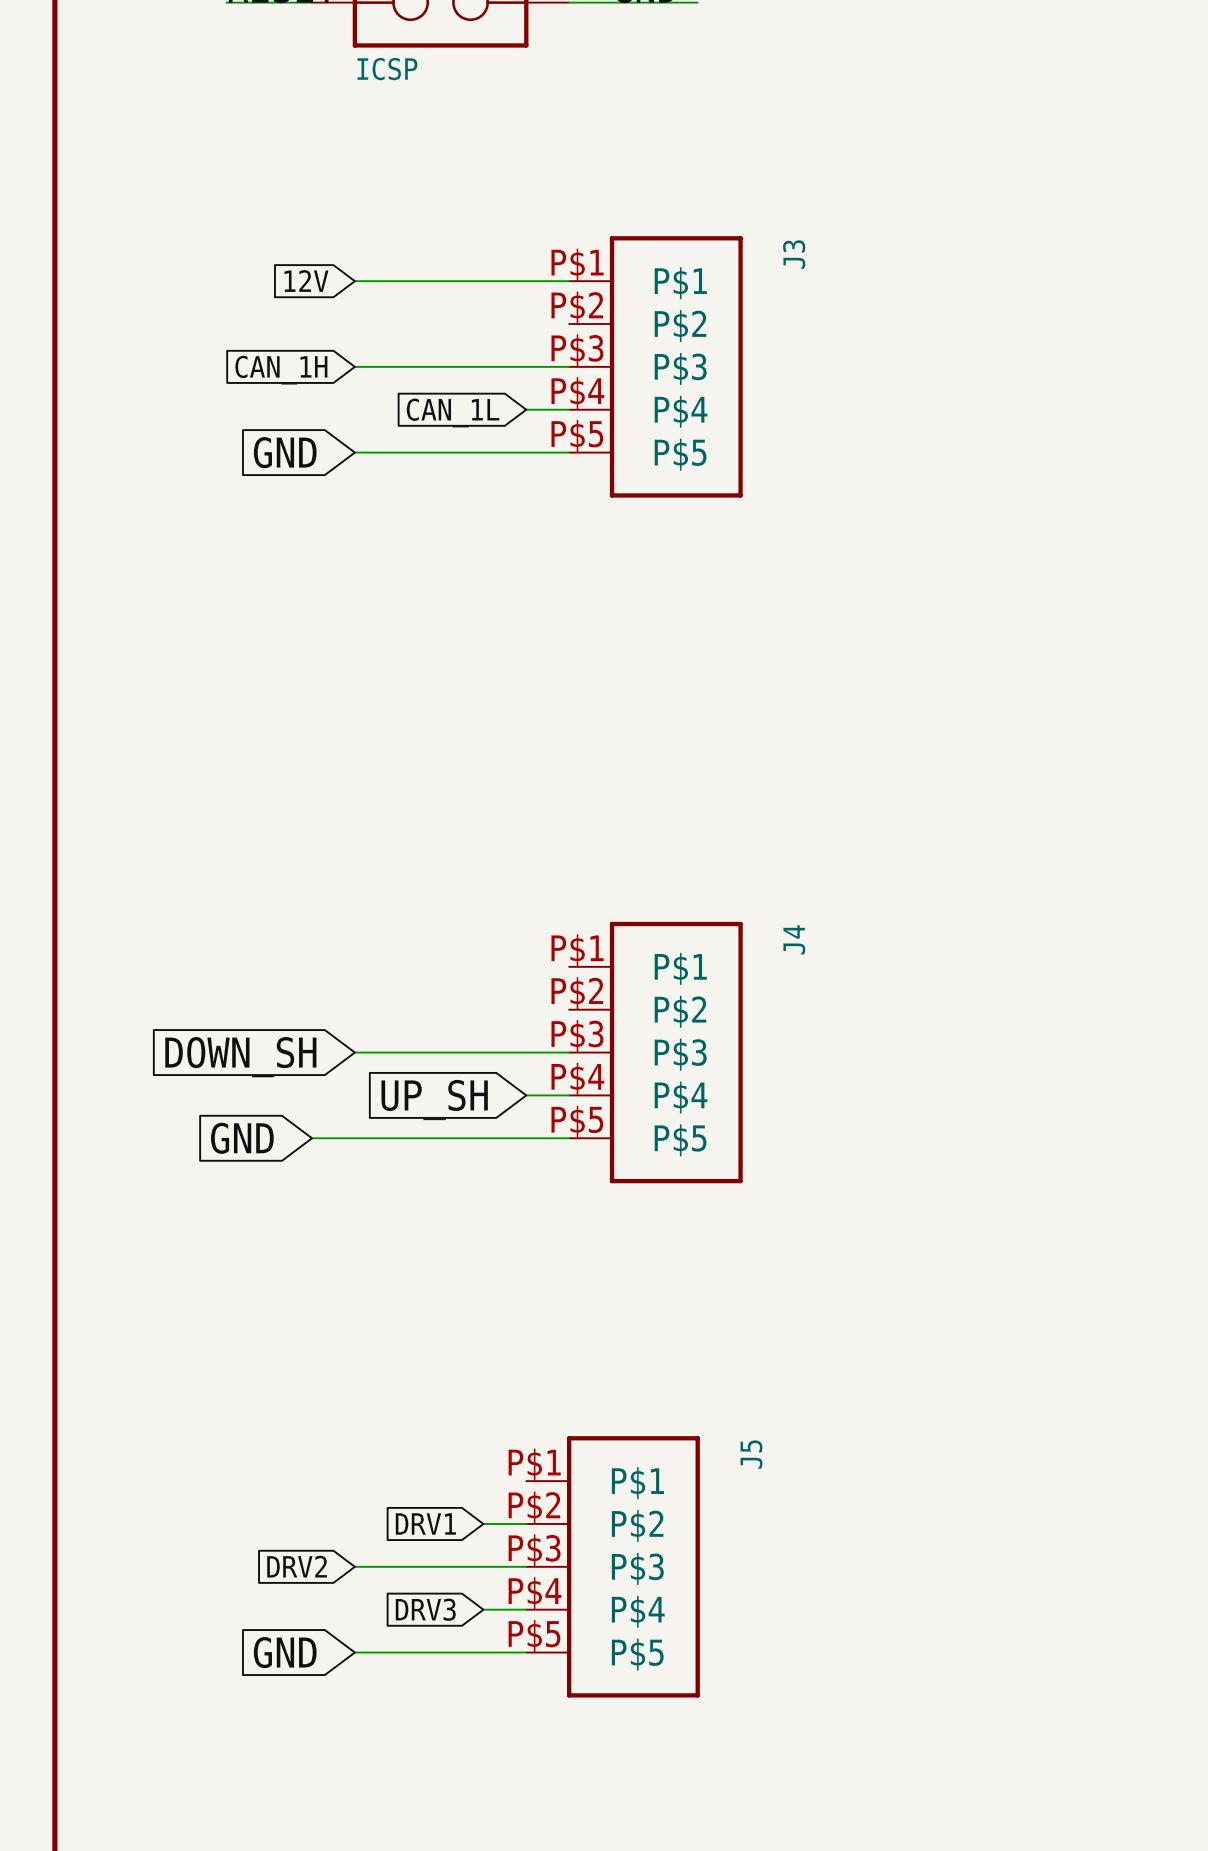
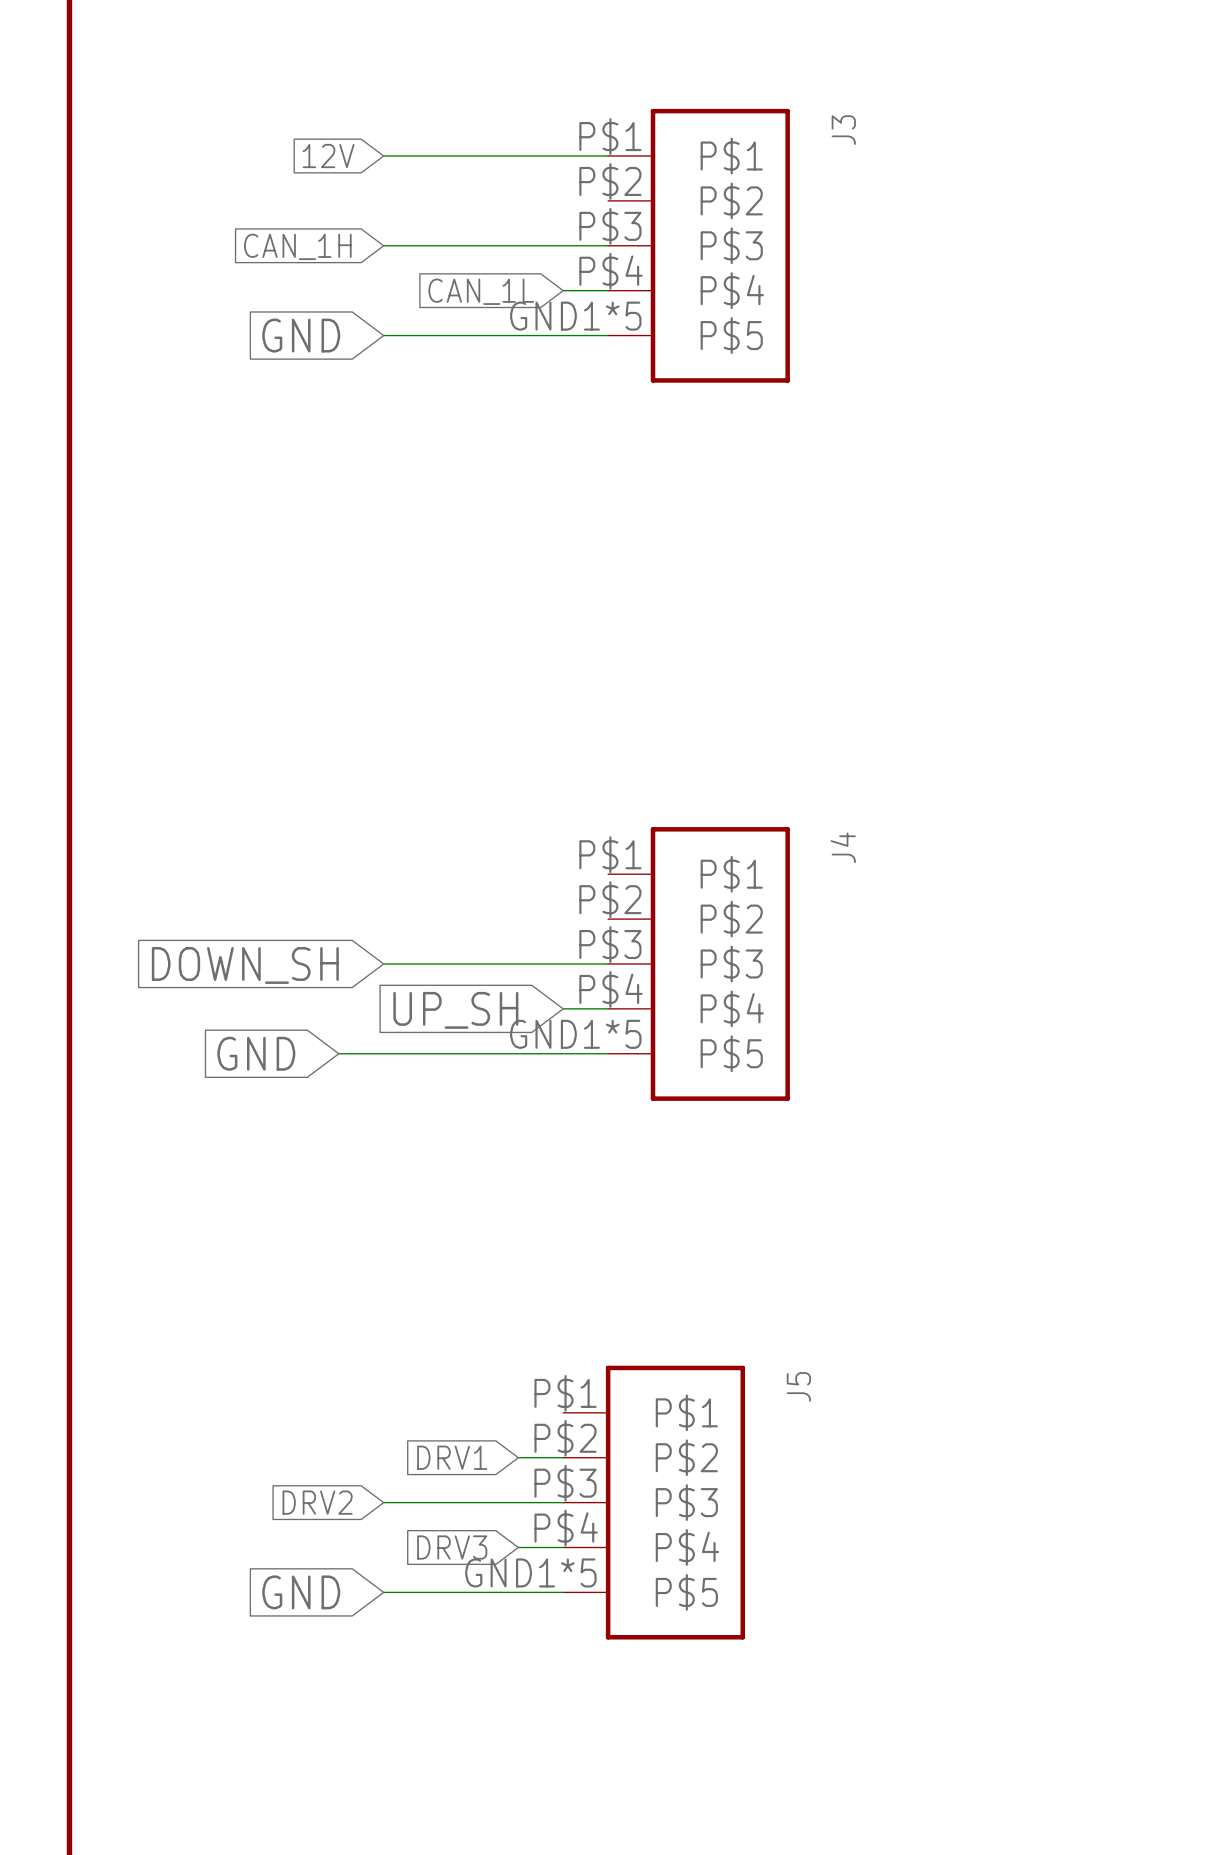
J3 pin number: P$5 (577, 436) -> GND1*5 (575, 316)
J4 pin number: P$5 (577, 1121) -> GND1*5 (575, 1034)
J5 pin number: P$5 (534, 1636) -> GND1*5 (530, 1572)

